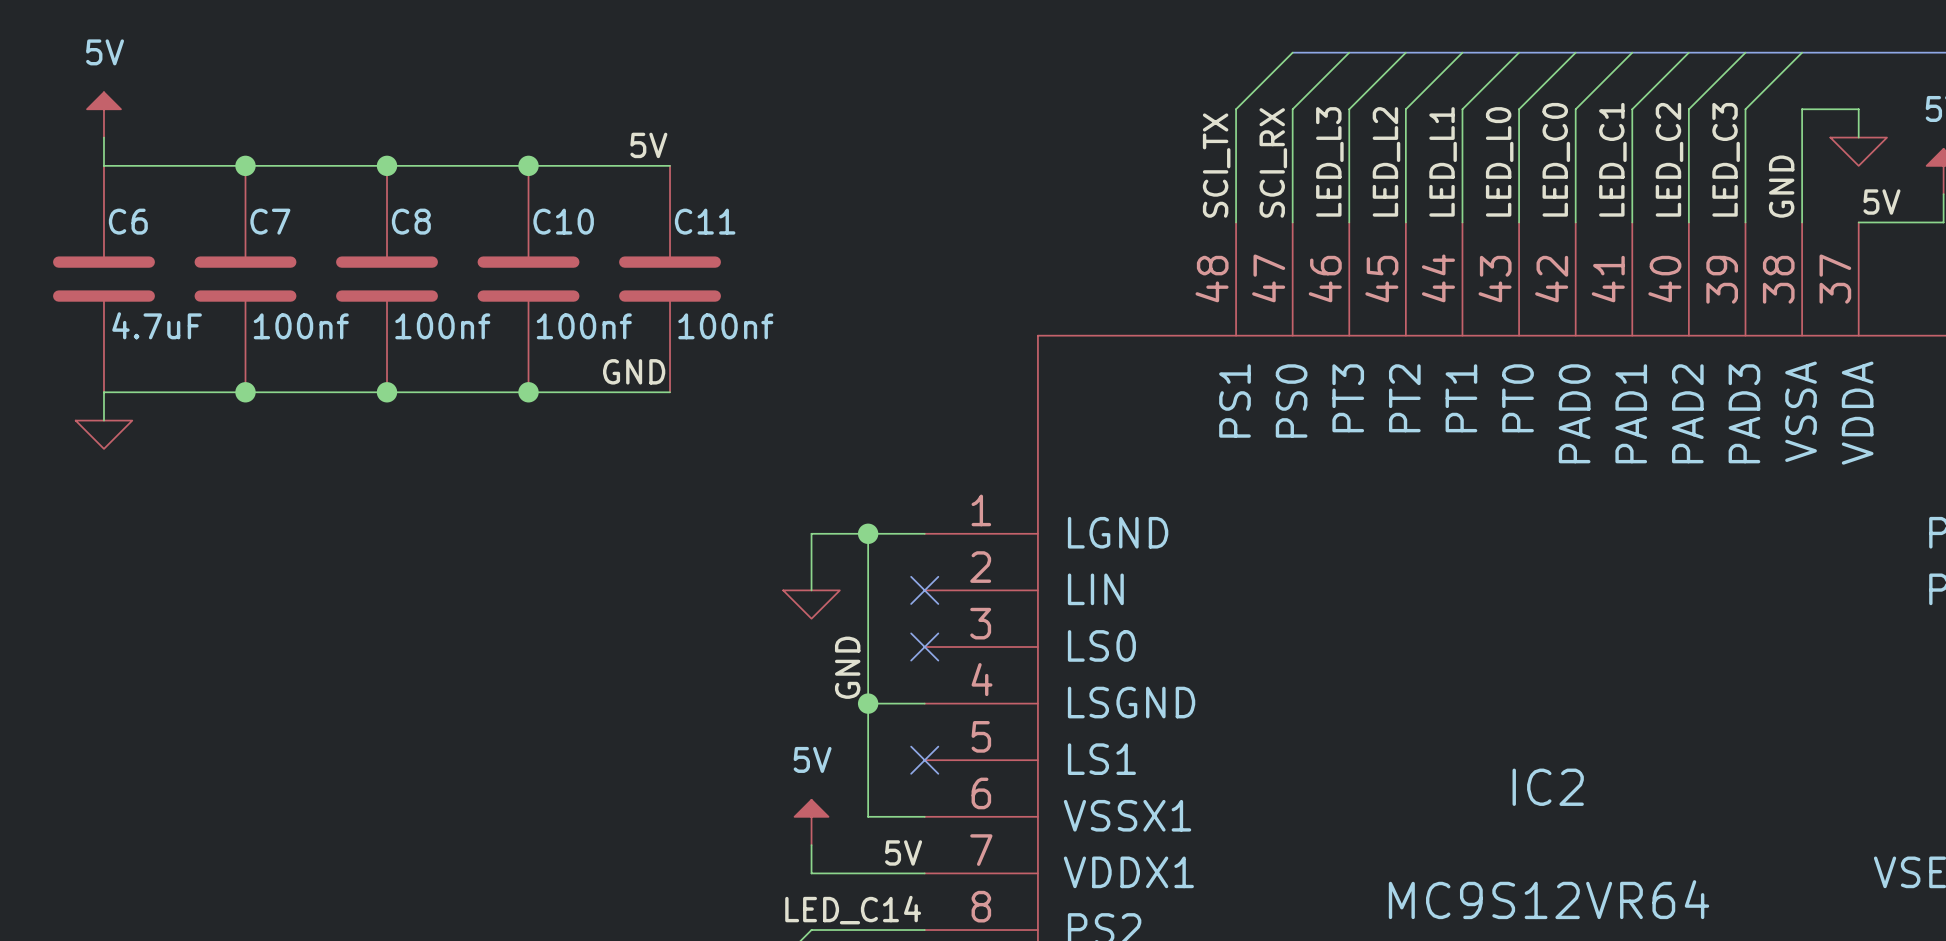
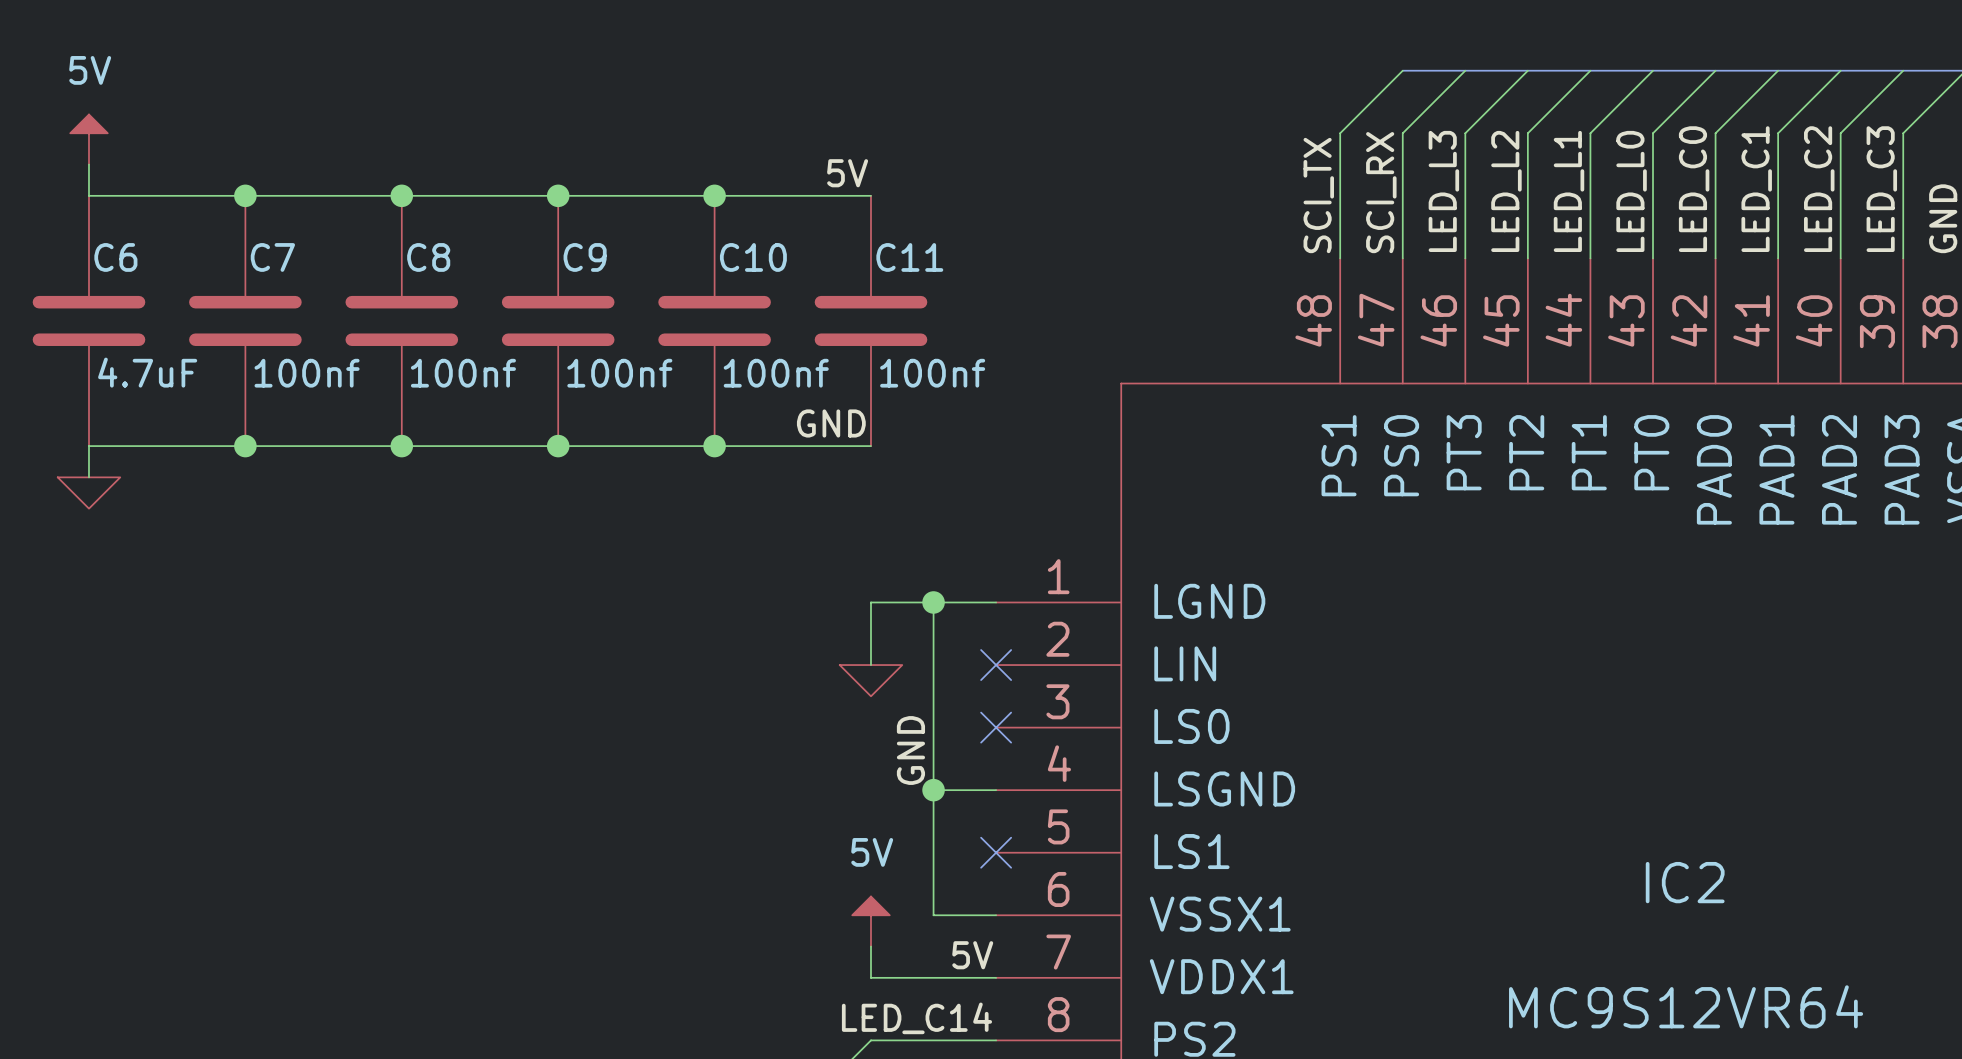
label position: 5V (648, 145) -> 5V (847, 173)
wire: none -> (714, 195) (870, 195)
junction: none -> (714, 195)
C10 name: C10 (563, 221) -> C9 (585, 257)
C11 name: C11 (705, 221) -> C10 (753, 257)
C11: none -> 100nf (870, 320)
label position: GND (634, 371) -> GND (831, 423)
wire: none -> (714, 446) (870, 446)
junction: none -> (714, 446)

